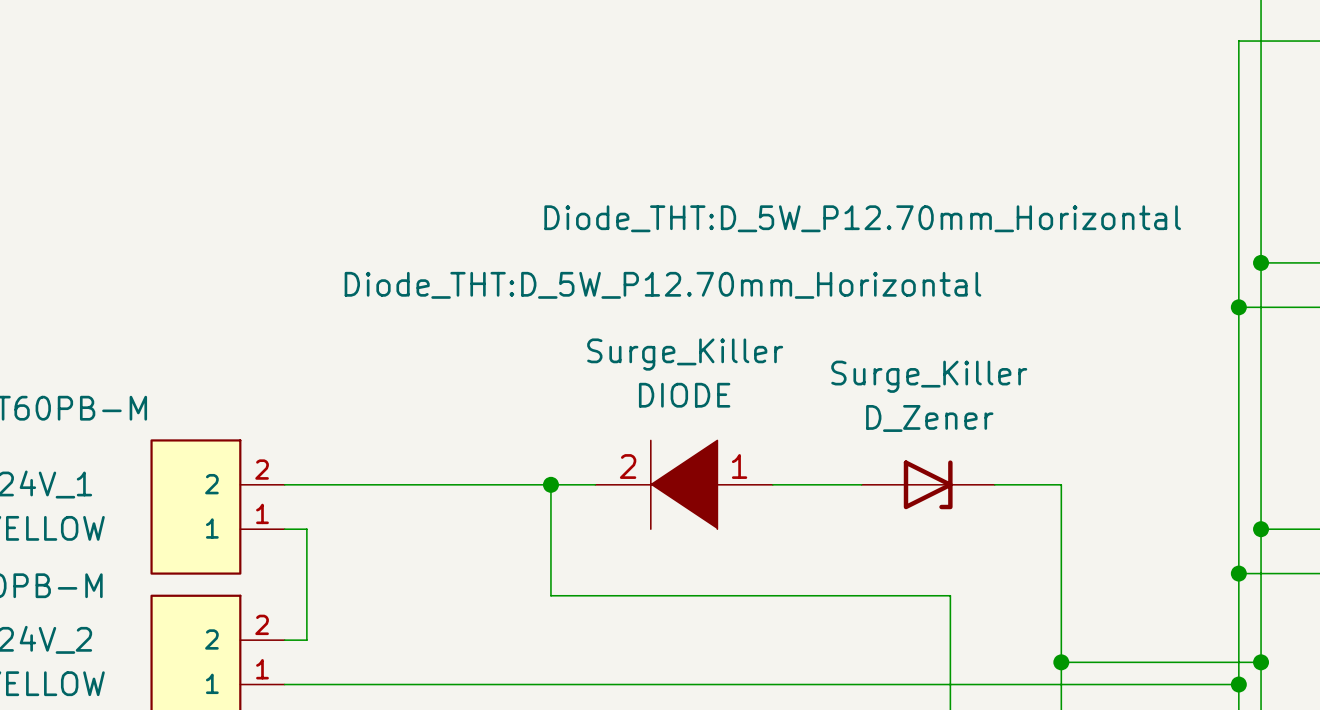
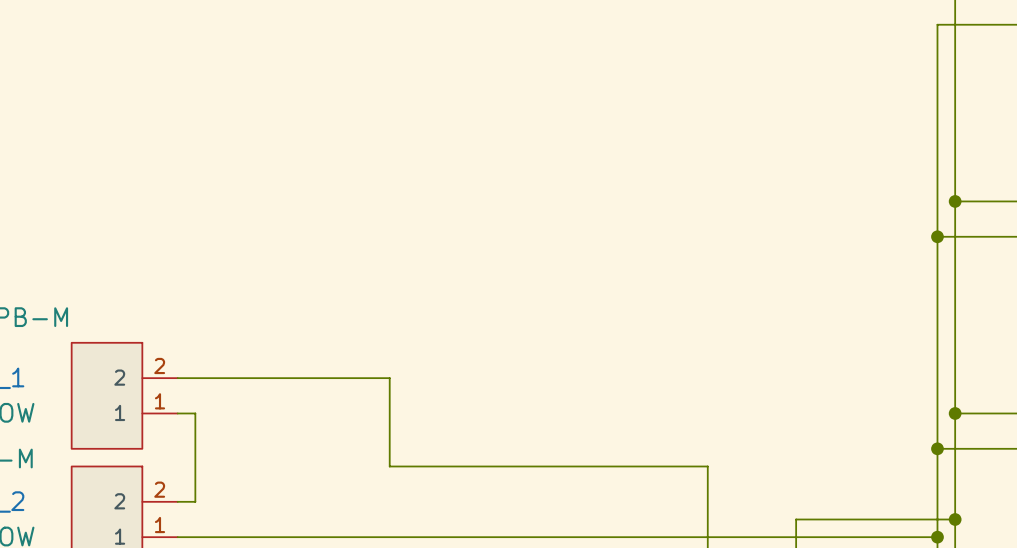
wire: (550, 484) (595, 484) -> none
junction: (550, 484) -> none
Surge_Killer: DIODE (684, 484) -> none
wire: (772, 484) (861, 484) -> none
Surge_Killer: D_Zener (928, 484) -> none
wire: (994, 484) (1061, 484) (1061, 662) -> none
junction: (1061, 662) -> none

